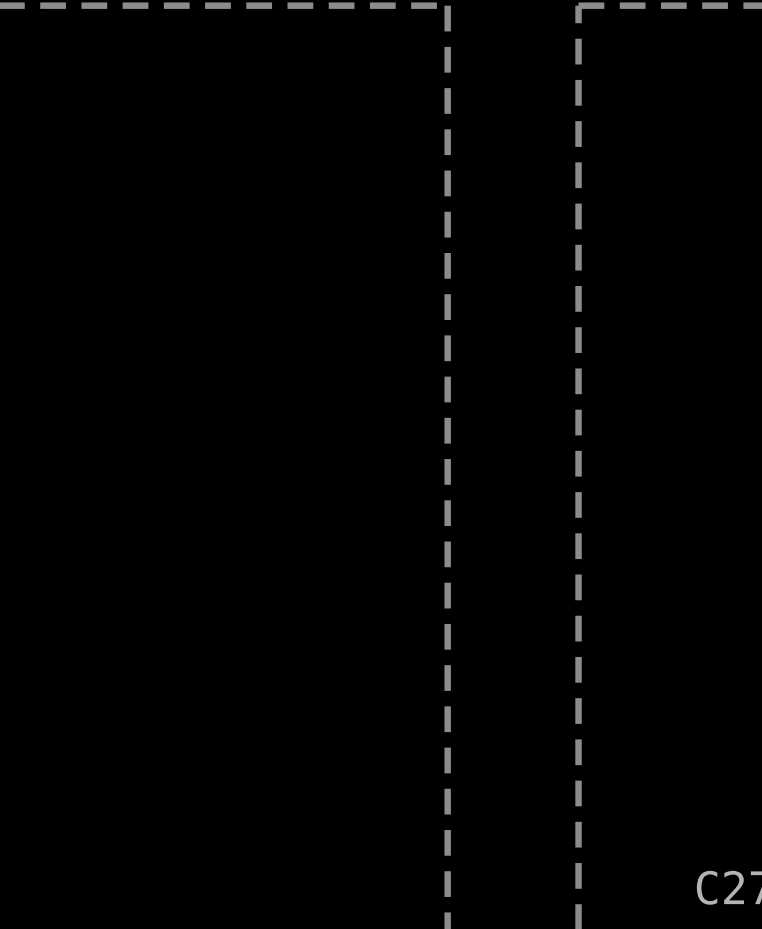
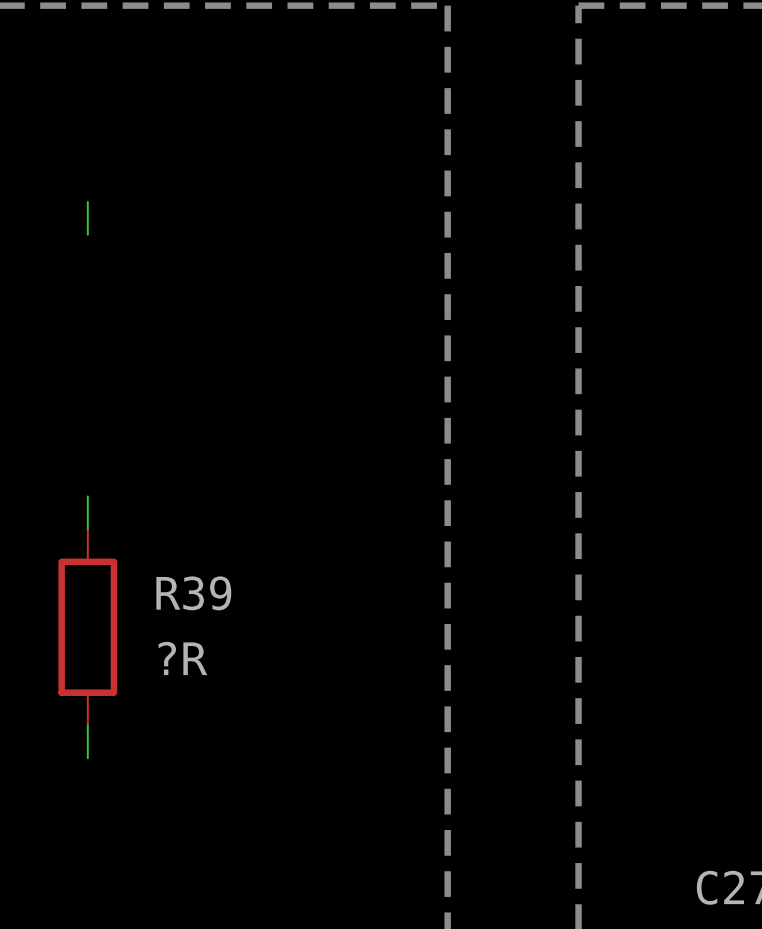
wire: none -> (87, 201) (87, 234)
wire: none -> (87, 496) (87, 529)
R39: none -> ?R (87, 627)
wire: none -> (87, 725) (87, 758)

